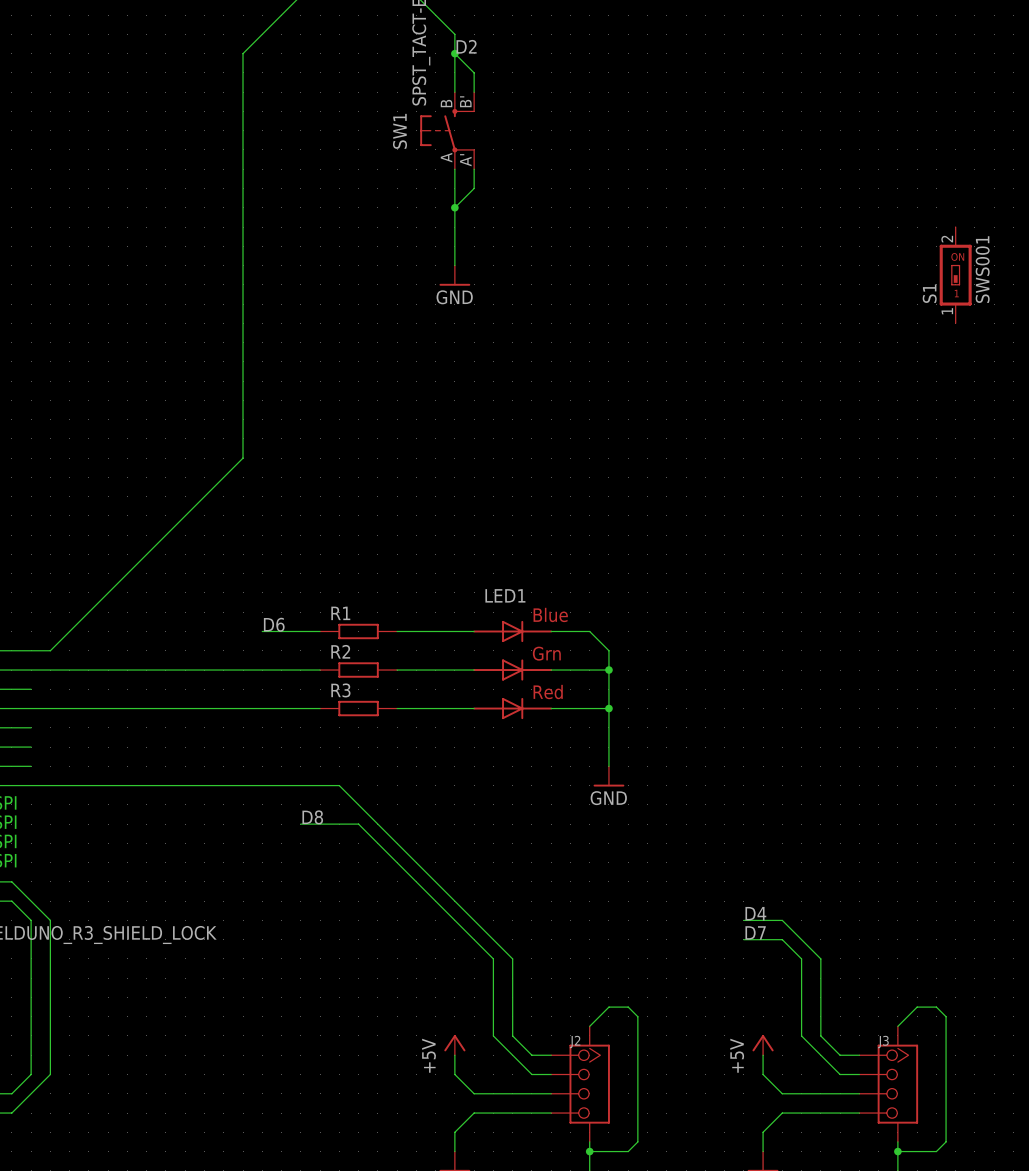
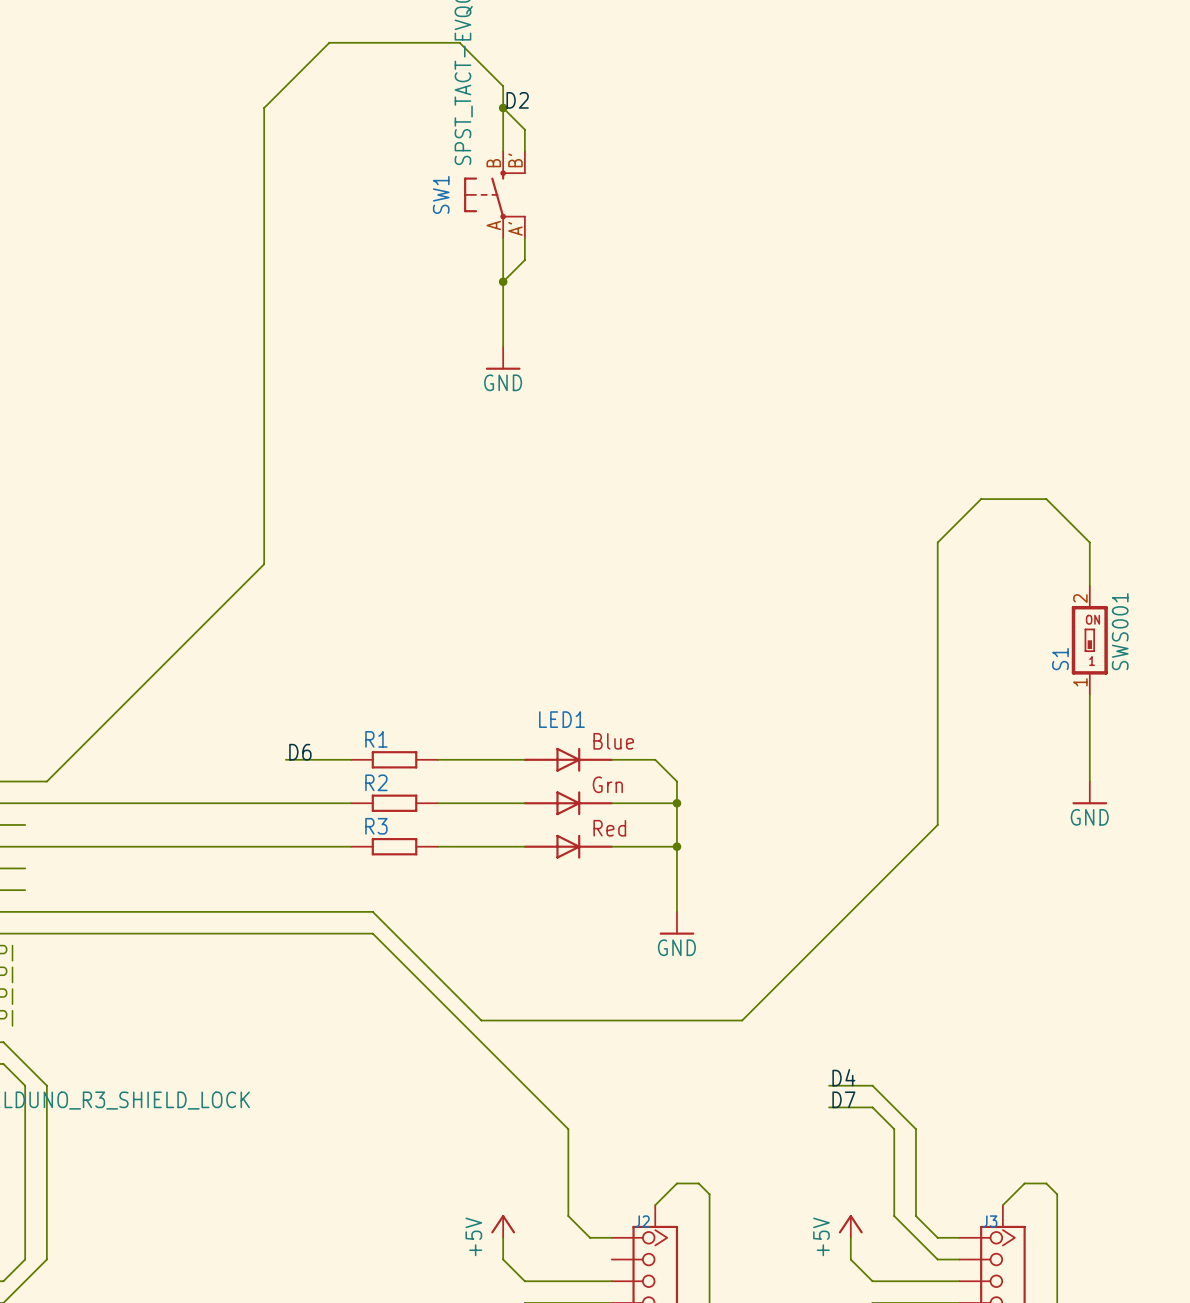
S1 position: (955, 275) -> (1089, 640)
wire: none -> (1089, 585) (1089, 542) (1046, 499) (981, 499) (937, 542) (937, 824) (742, 1020) (481, 1020) (372, 911) (25, 911)
wire: none -> (1089, 694) (1089, 781)
power symbol: none -> GND (1089, 792)
label: D8 (312, 817) -> none
wire: (300, 824) (358, 824) (493, 958) (493, 1035) (531, 1074) (551, 1074) -> none

